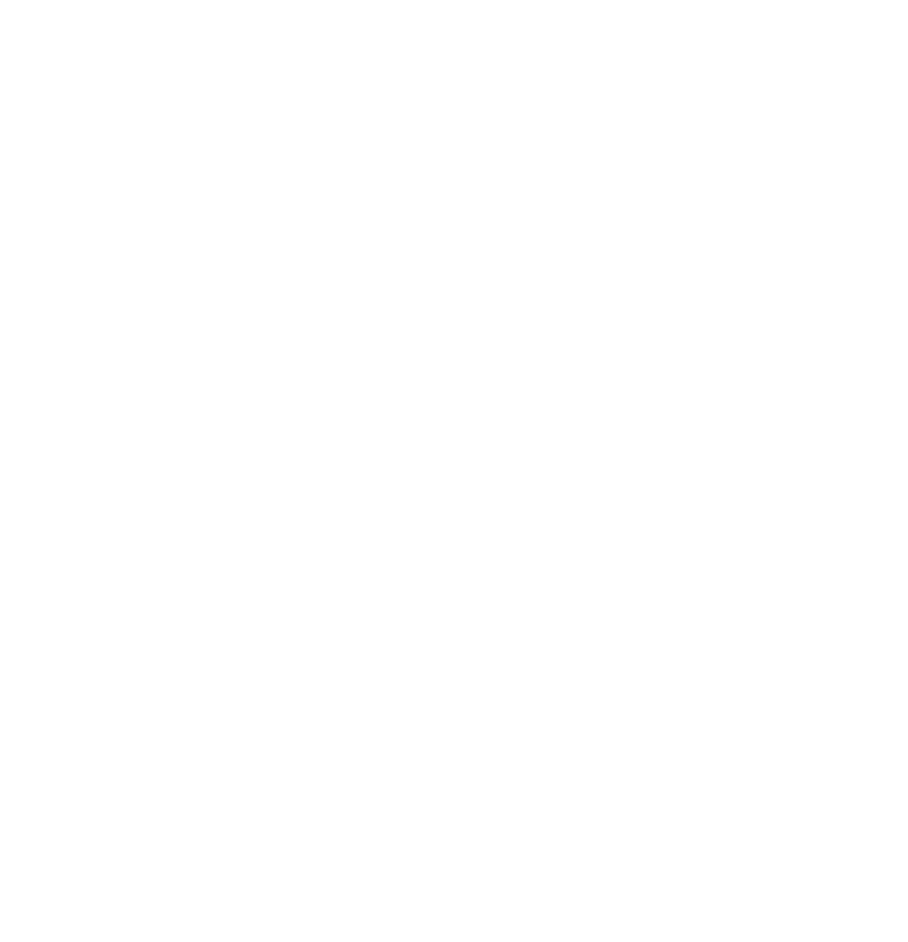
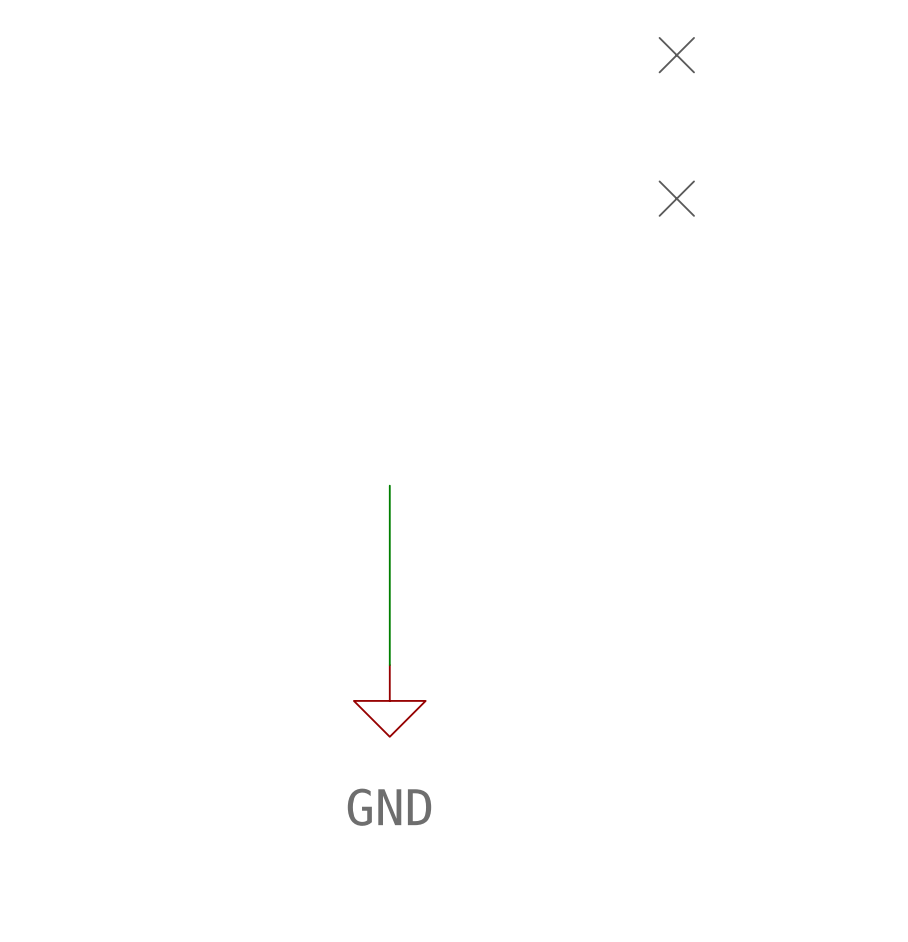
no-connect mark: none -> (676, 55)
no-connect mark: none -> (676, 198)
wire: none -> (389, 485) (389, 665)
power symbol: none -> GND (389, 700)

